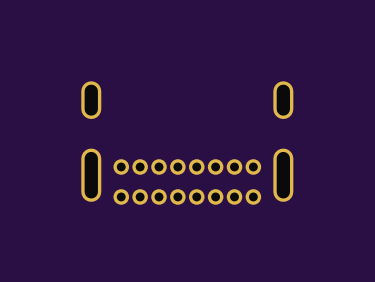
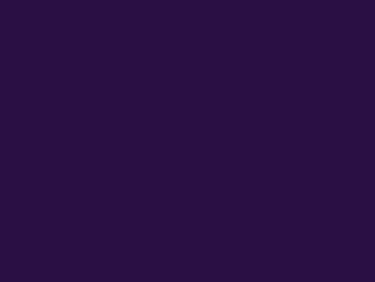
part: (187, 143) -> none

